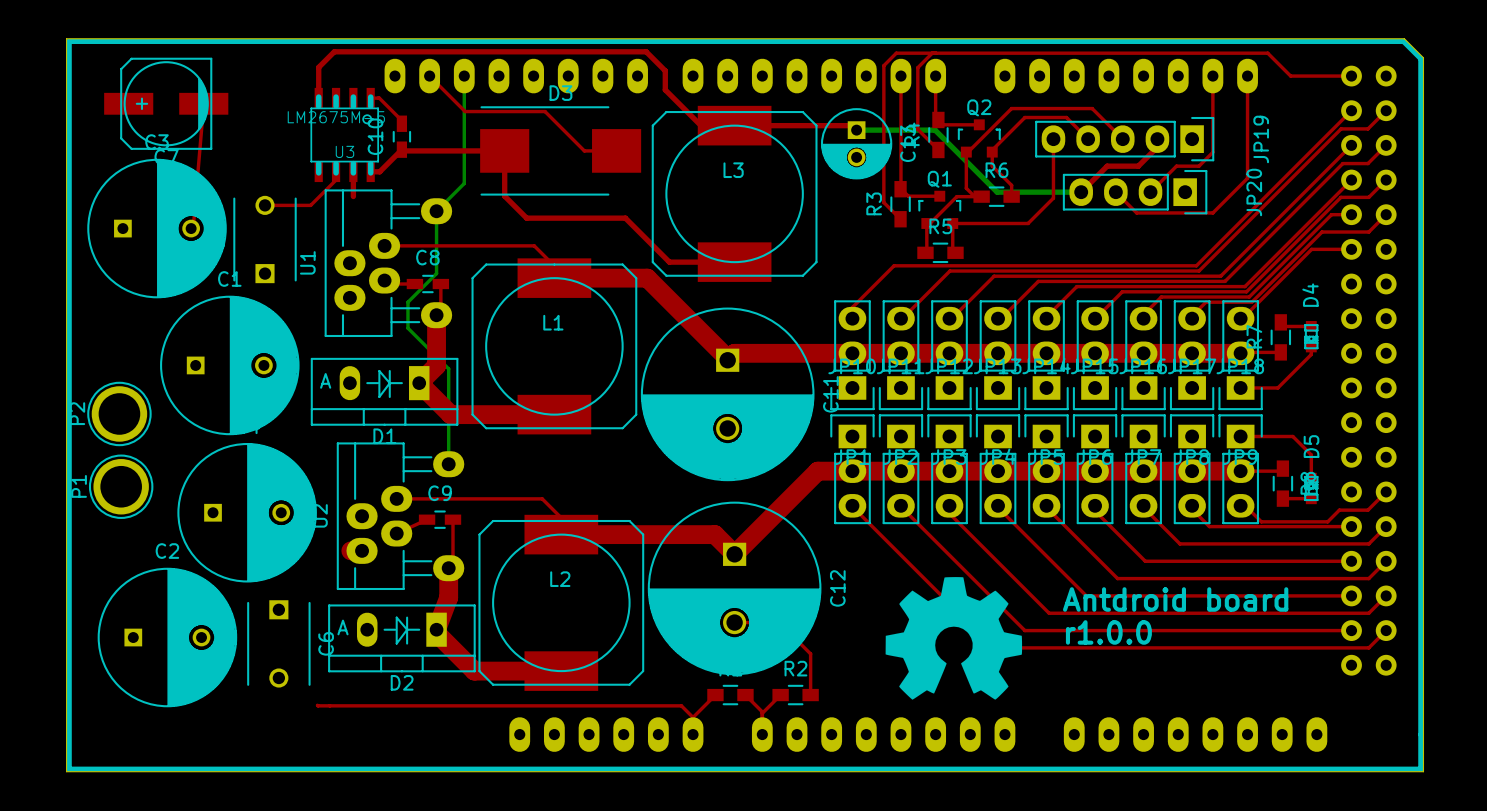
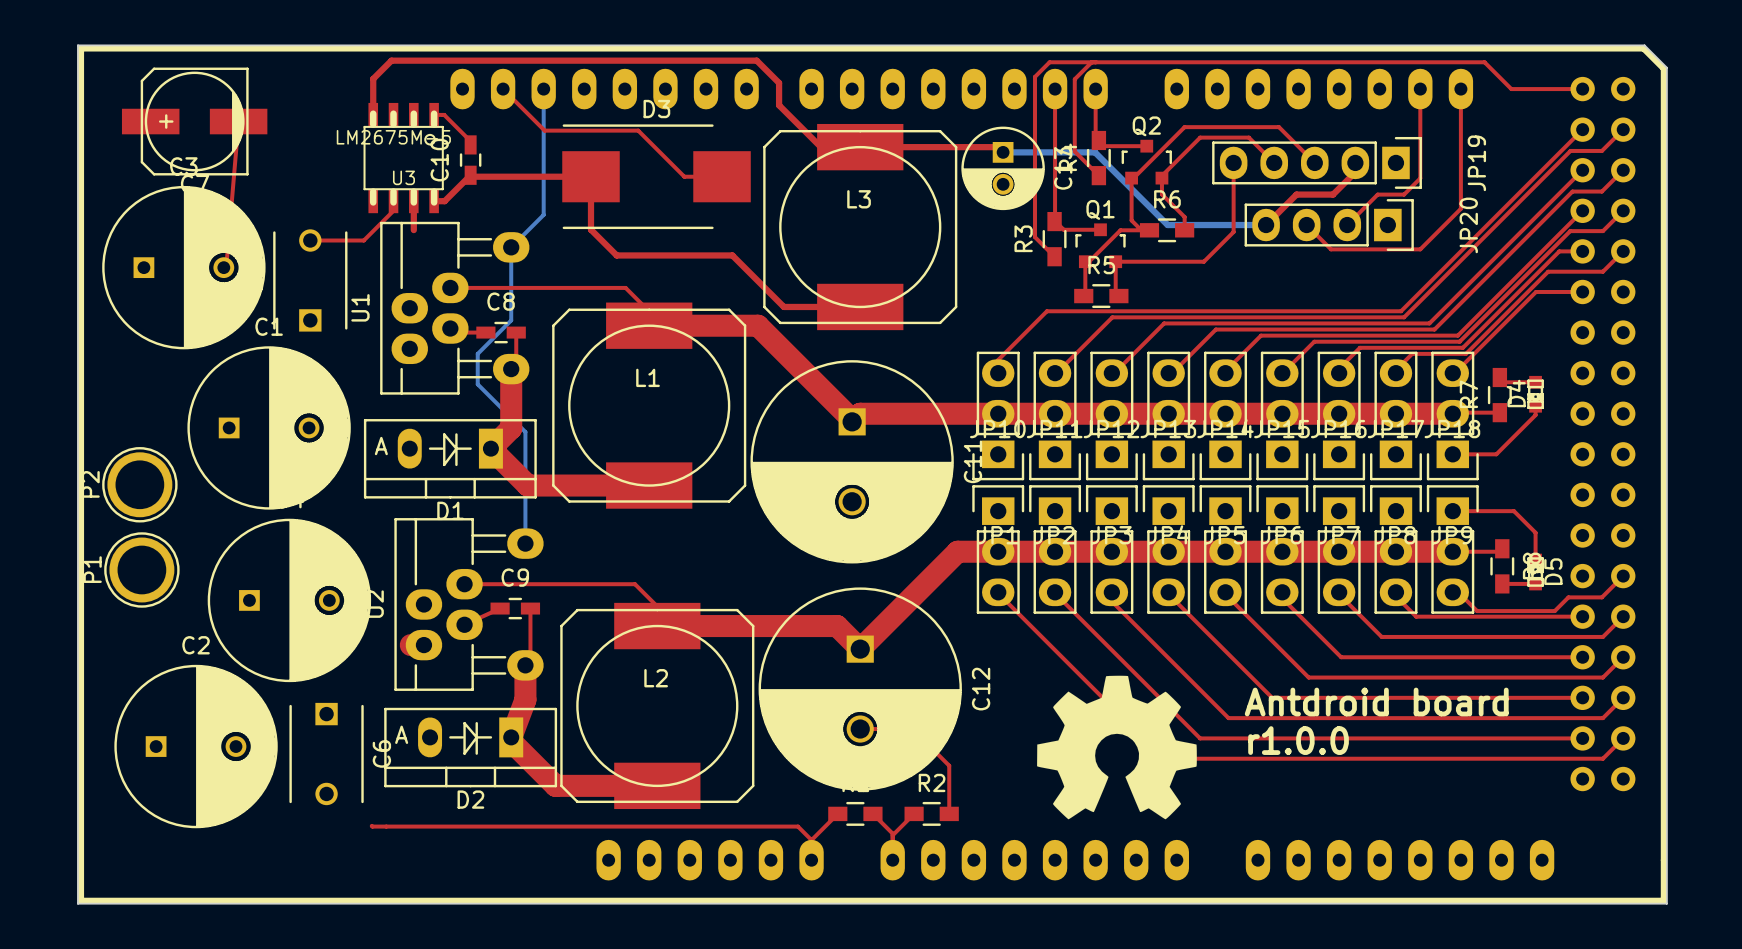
D4 name position: D4 (1310, 295) -> D4 (1516, 393)
D5 name position: D5 (1311, 446) -> D5 (1553, 571)

